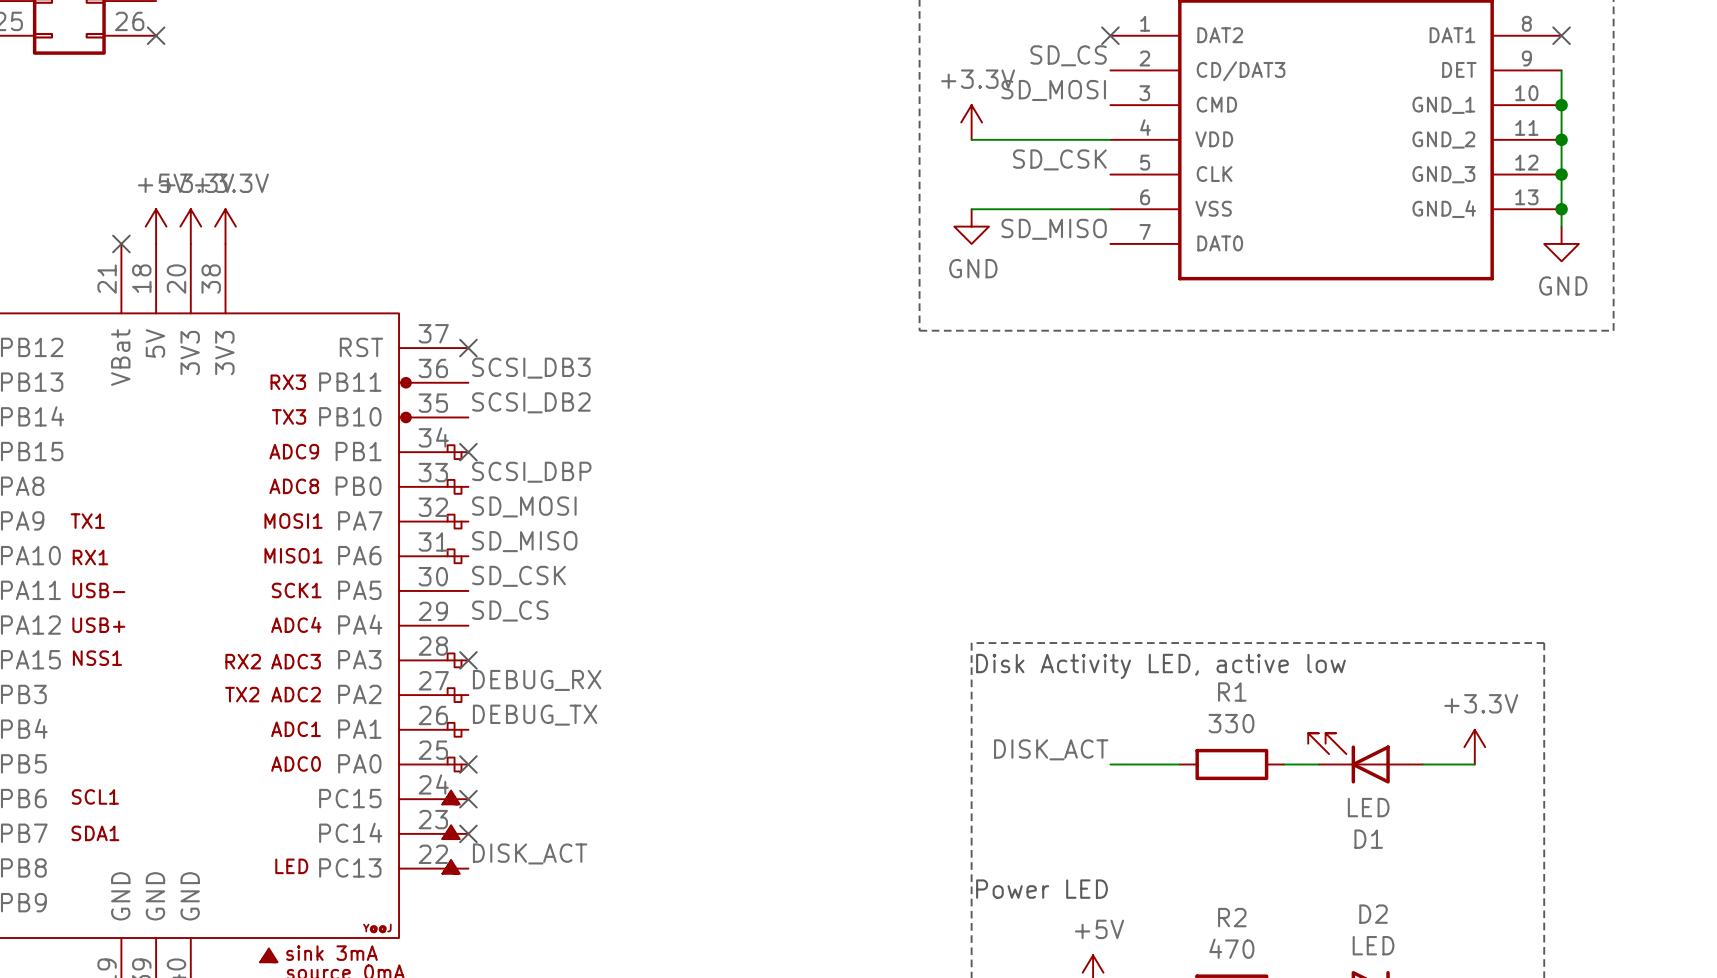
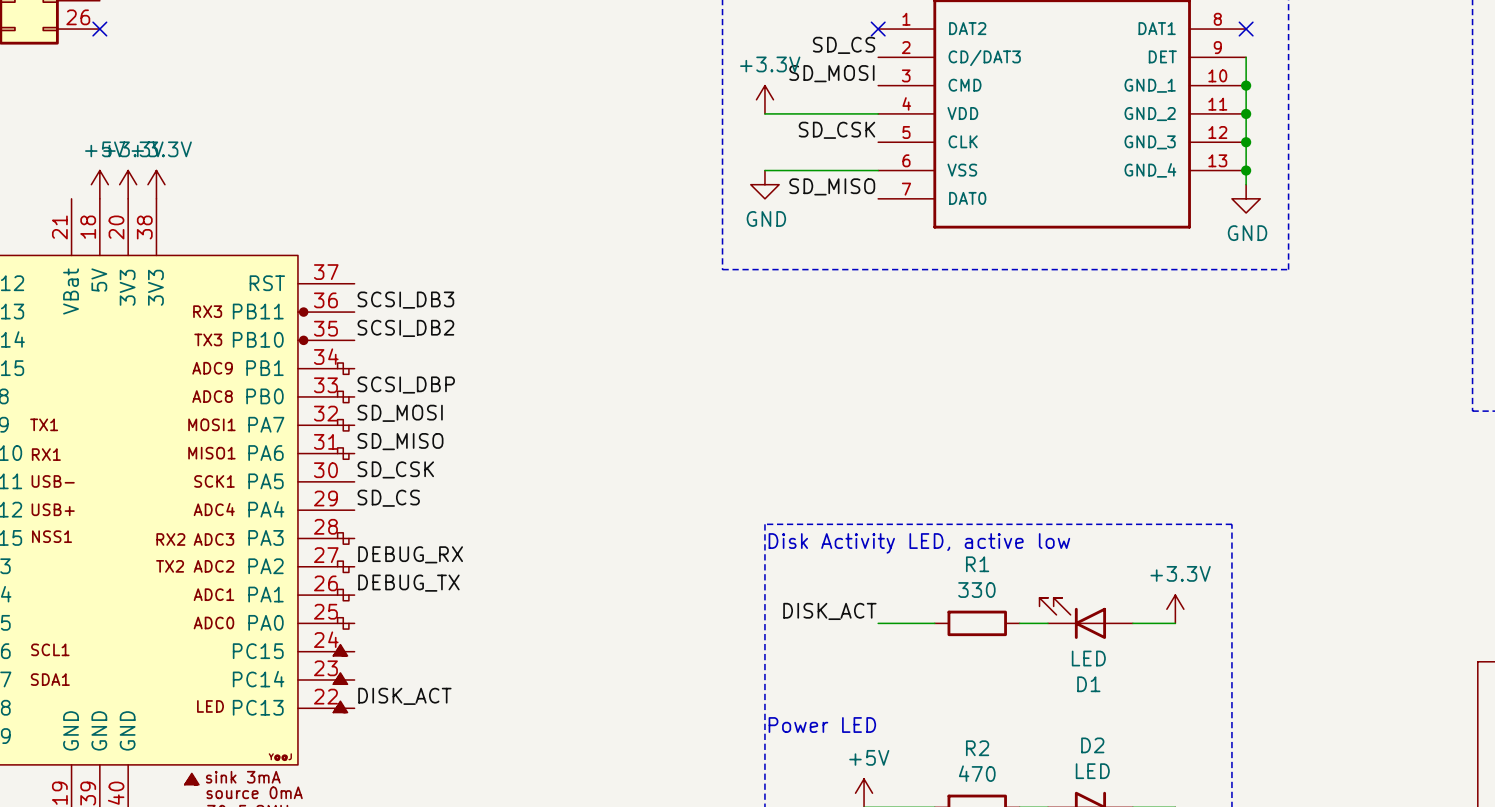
no-connect mark: (121, 243) -> none
no-connect mark: (468, 348) -> none
no-connect mark: (468, 452) -> none
no-connect mark: (468, 660) -> none
no-connect mark: (468, 764) -> none
no-connect mark: (468, 799) -> none
no-connect mark: (468, 833) -> none

